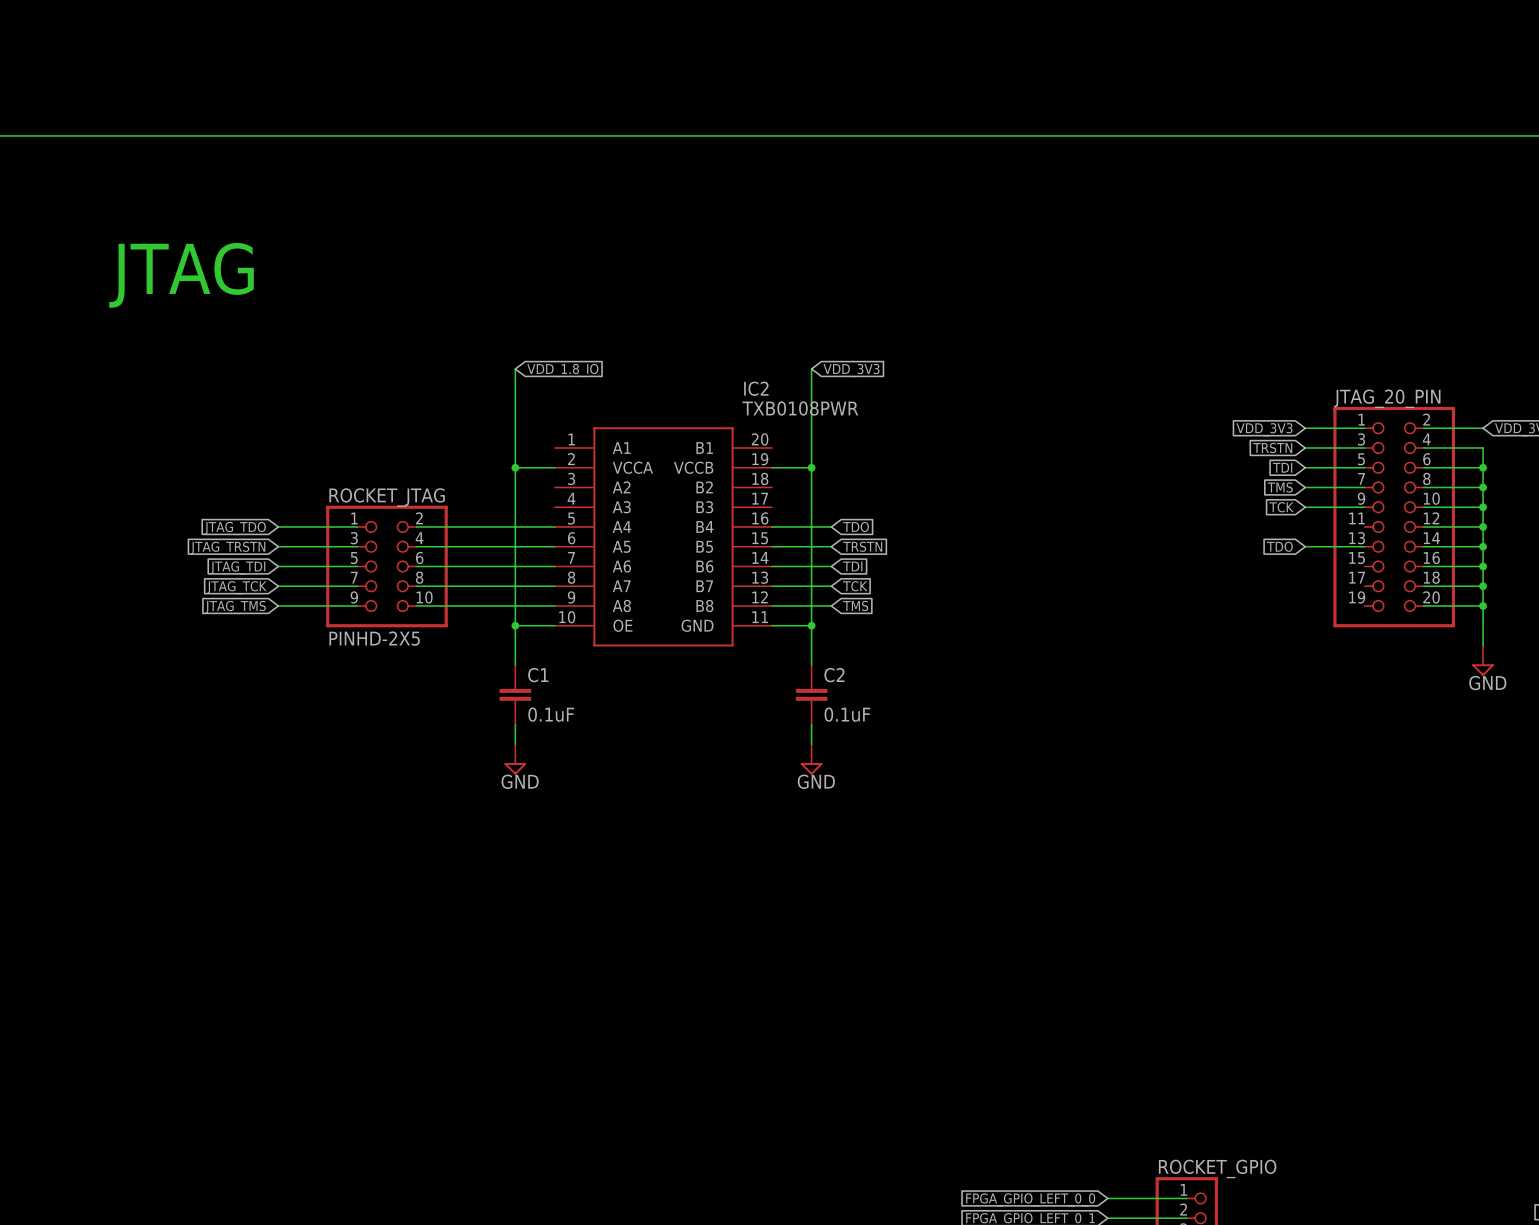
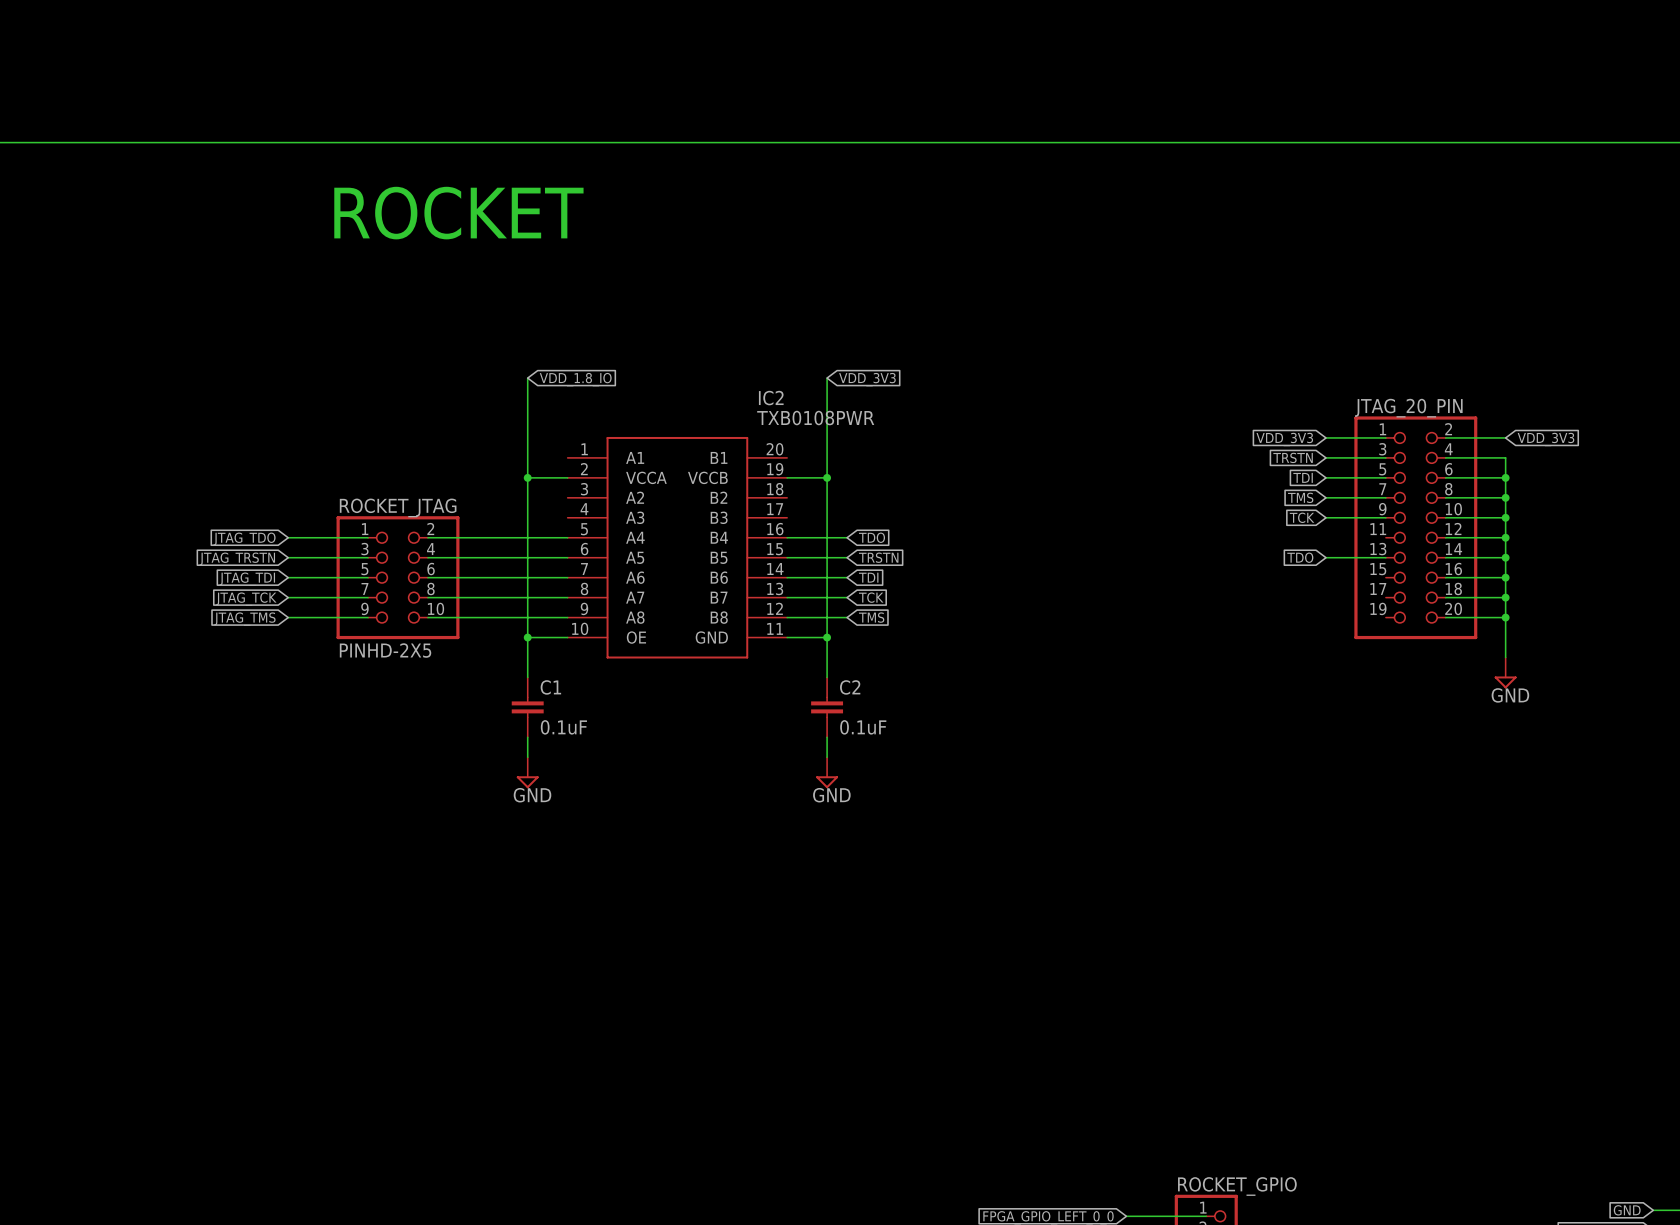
text: none -> ROCKET (458, 213)
text: JTAG (181, 275) -> none

